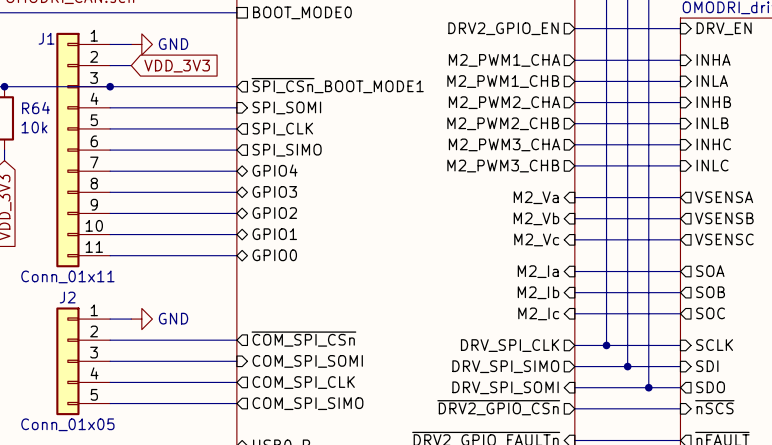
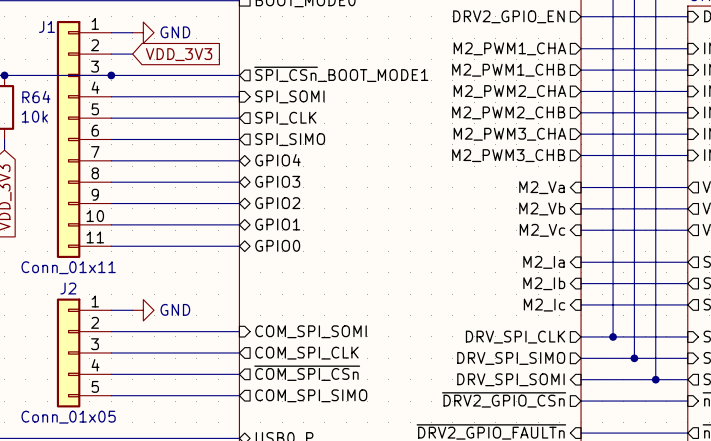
sheet pin shape: output (303, 339) -> input (311, 331)
sheet pin: ~{COM_SPI_CSn} (303, 339) -> COM_SPI_SOMI (311, 331)
sheet pin shape: input (307, 361) -> output (306, 353)
sheet pin: COM_SPI_SOMI (307, 361) -> COM_SPI_CLK (306, 353)
sheet pin: COM_SPI_CLK (303, 382) -> ~{COM_SPI_CSn} (307, 373)

